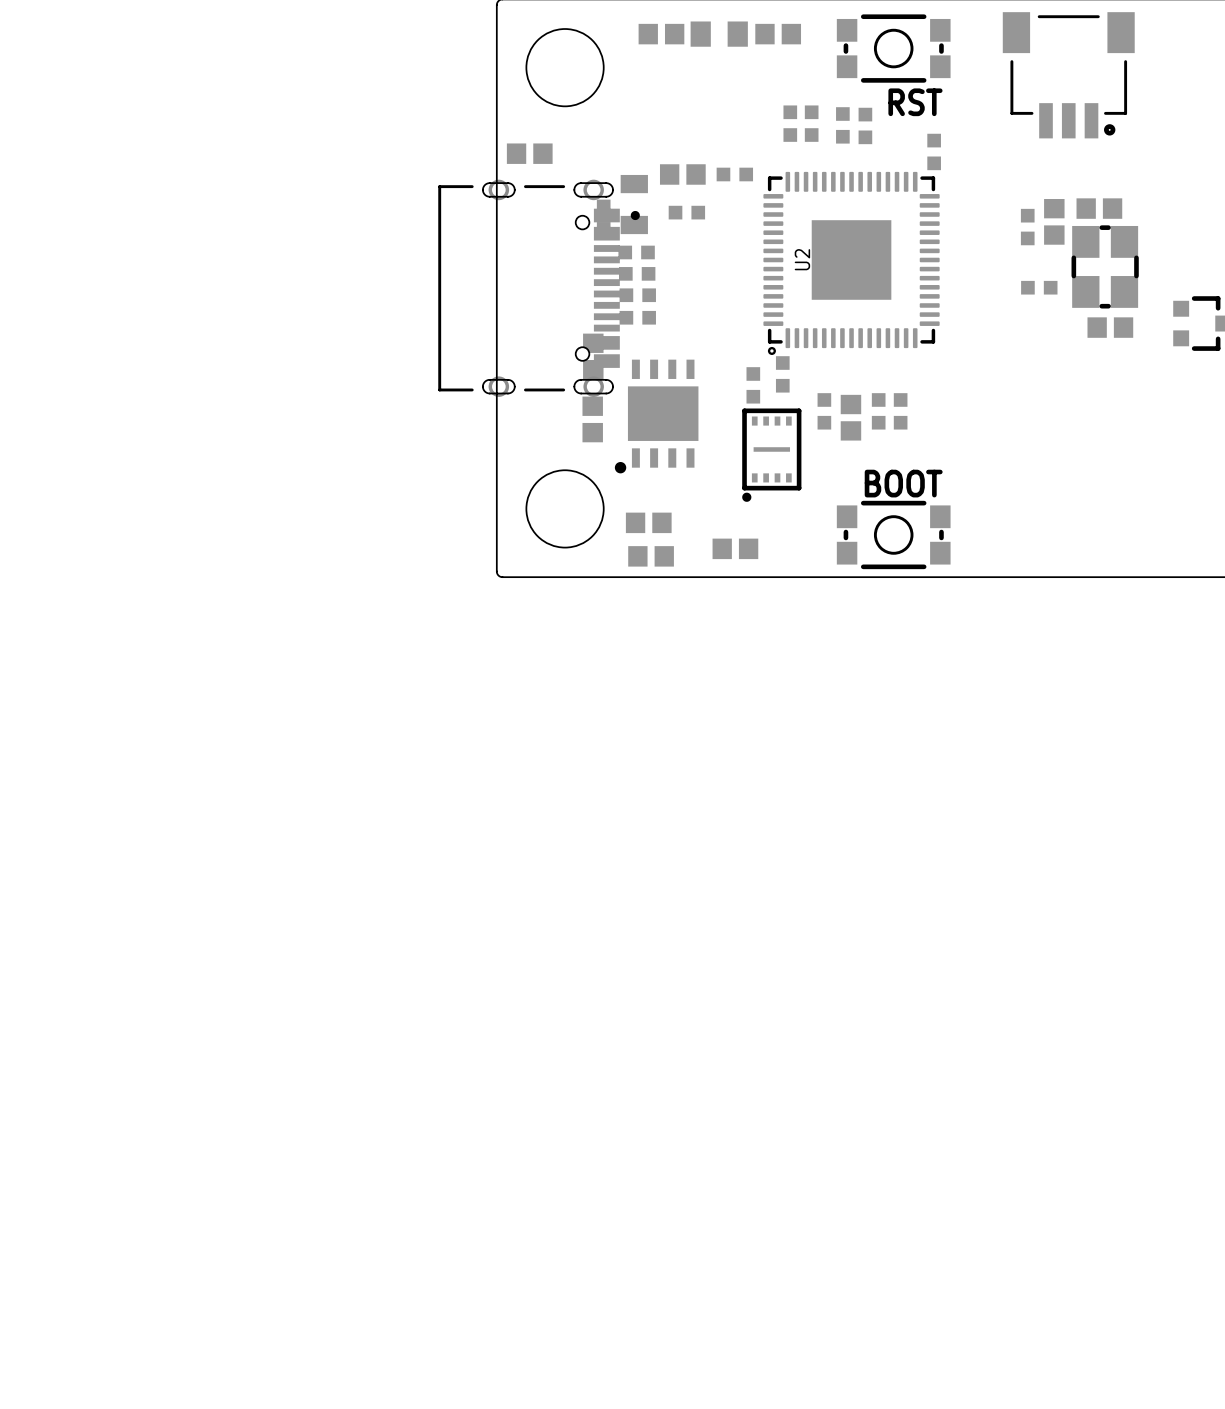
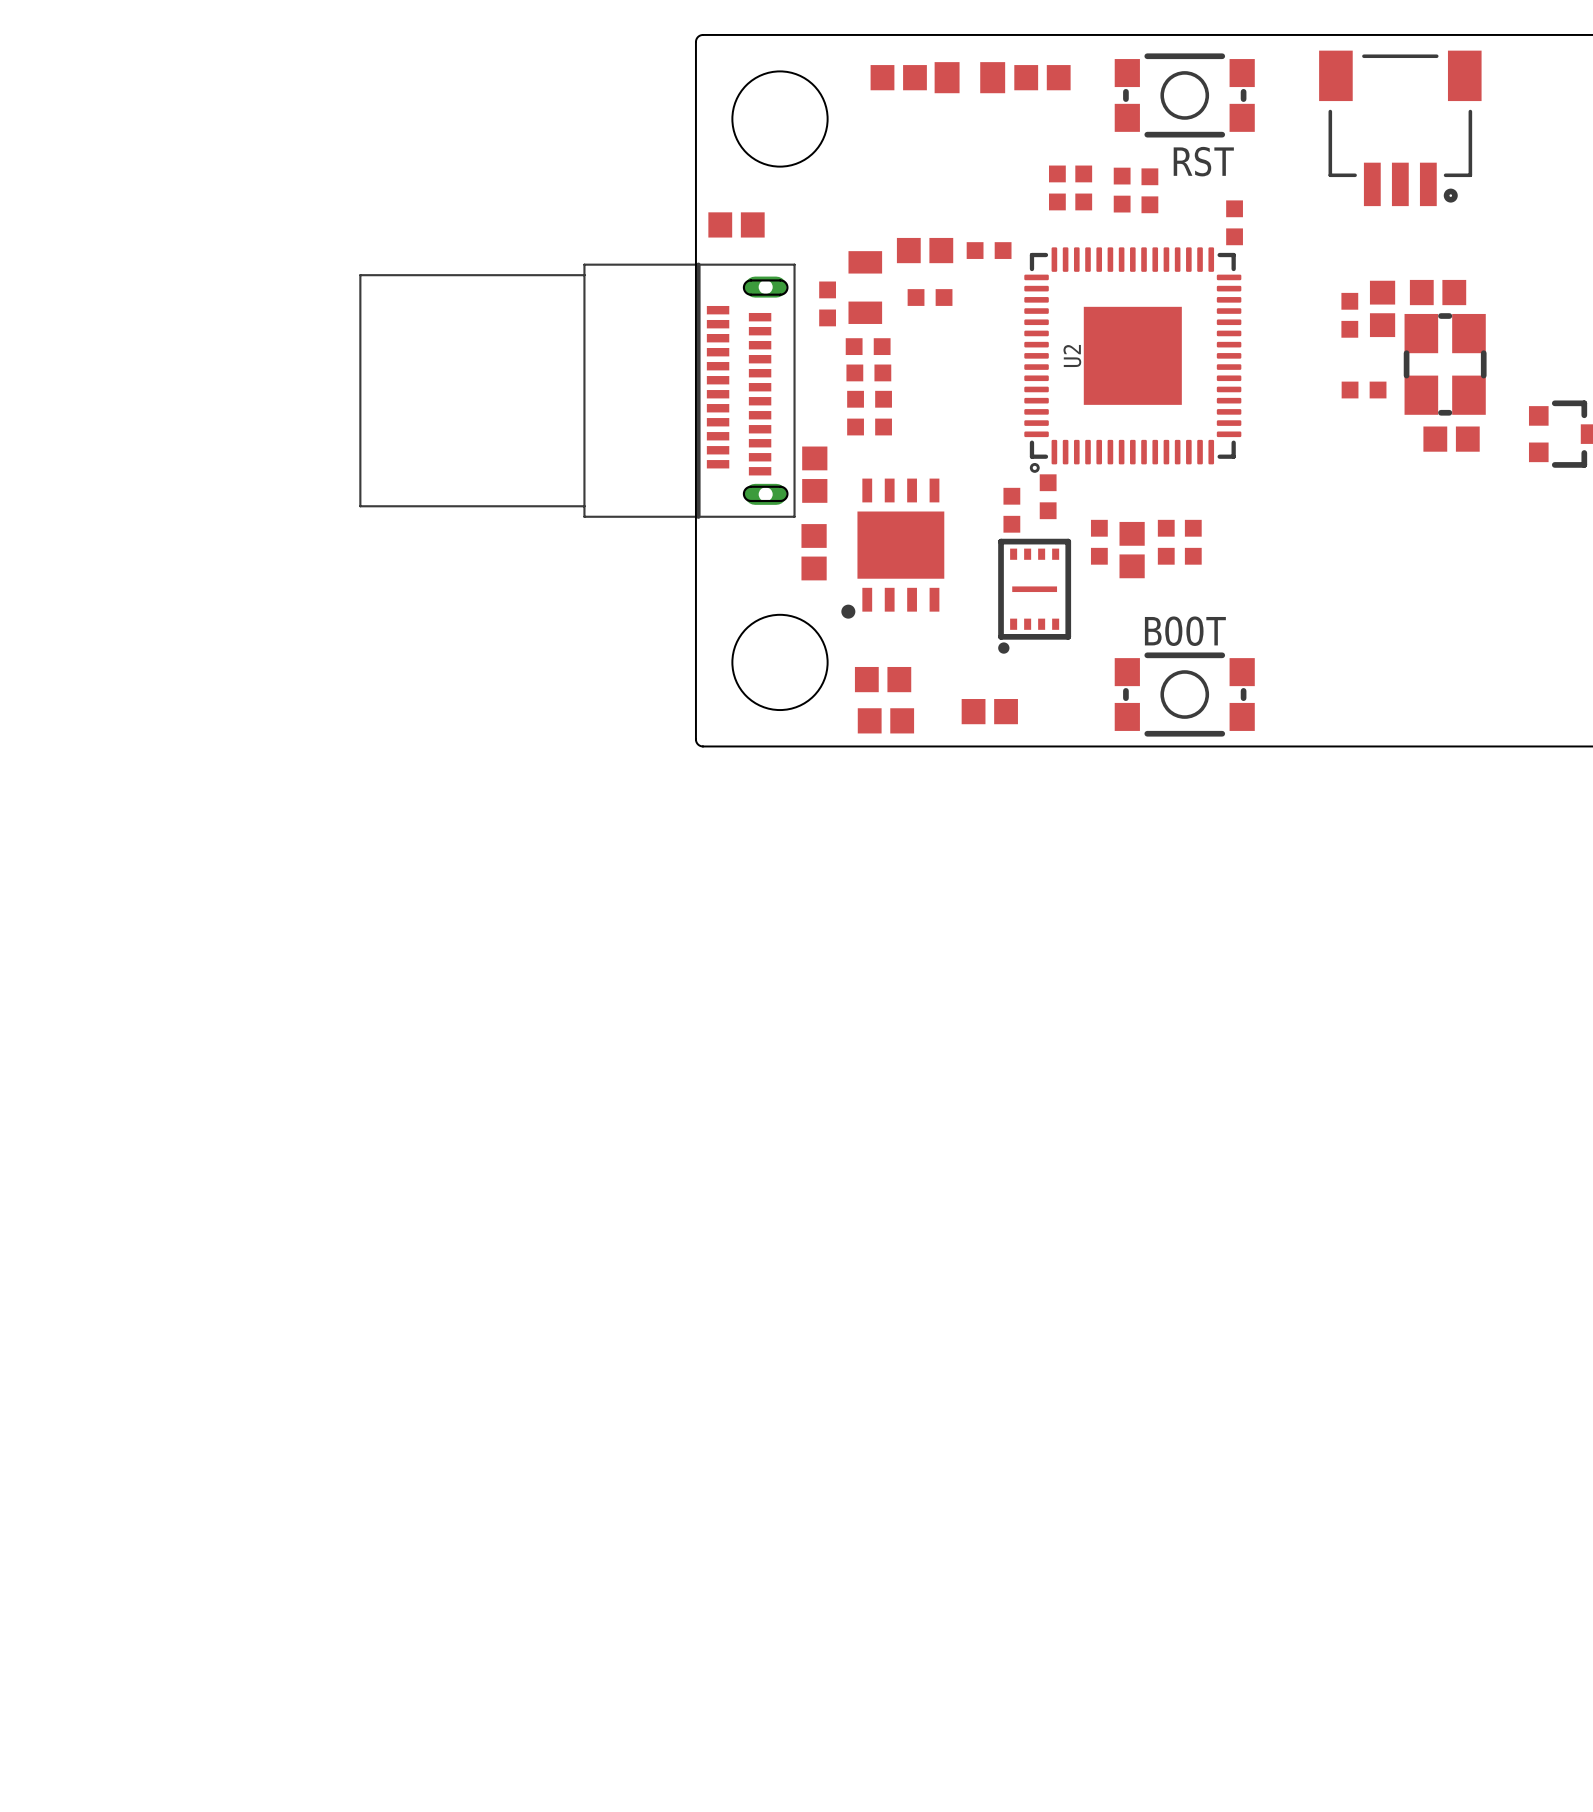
part: none -> (577, 390)
part: (539, 288) -> none

